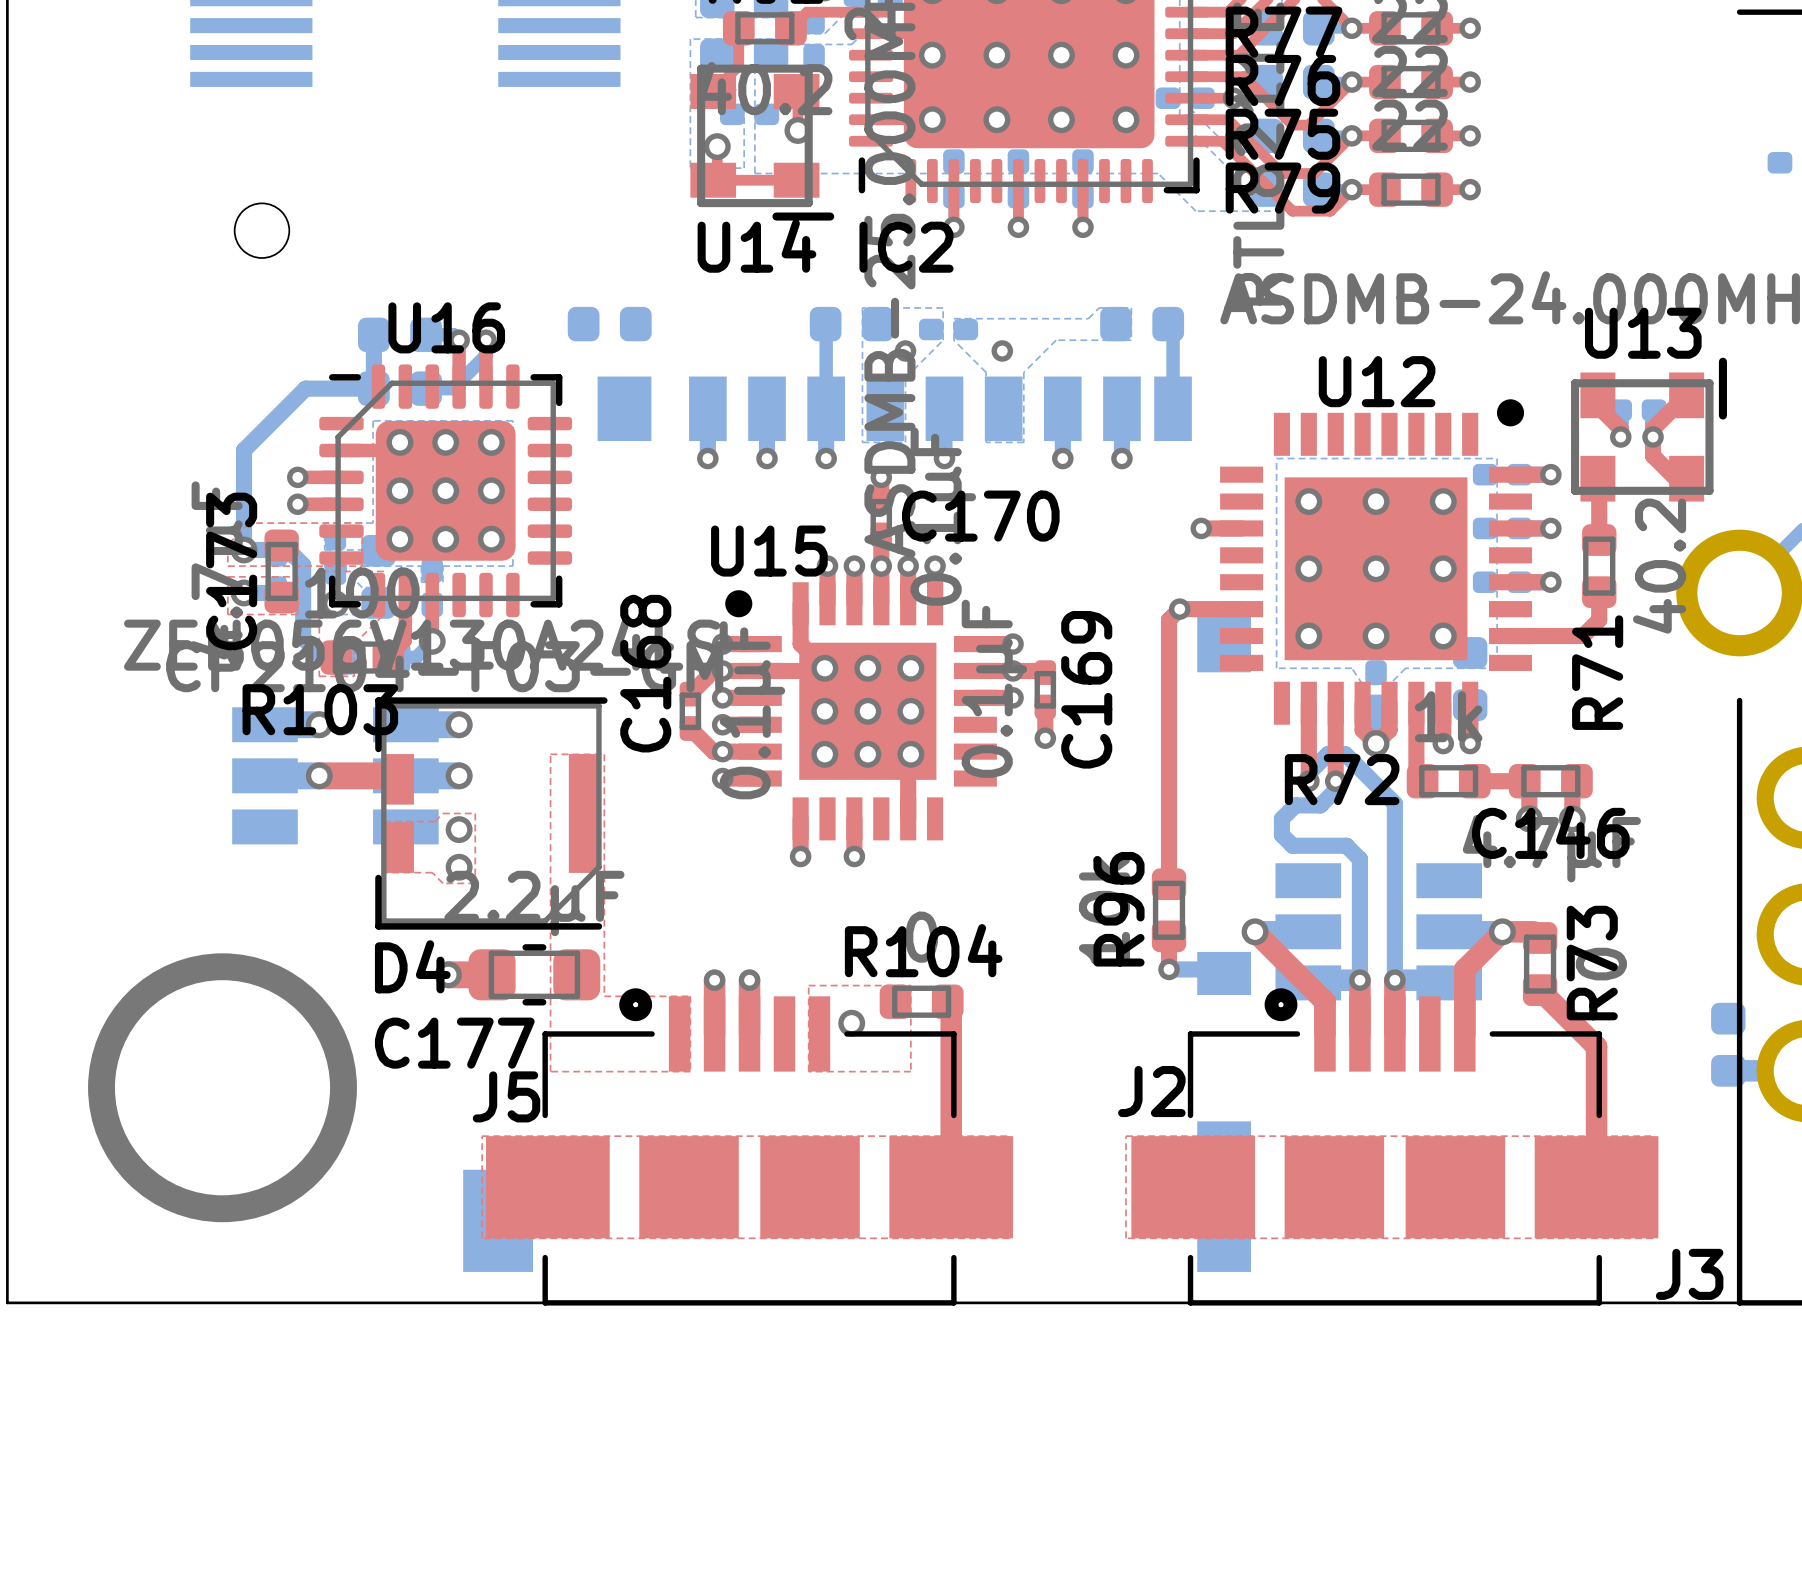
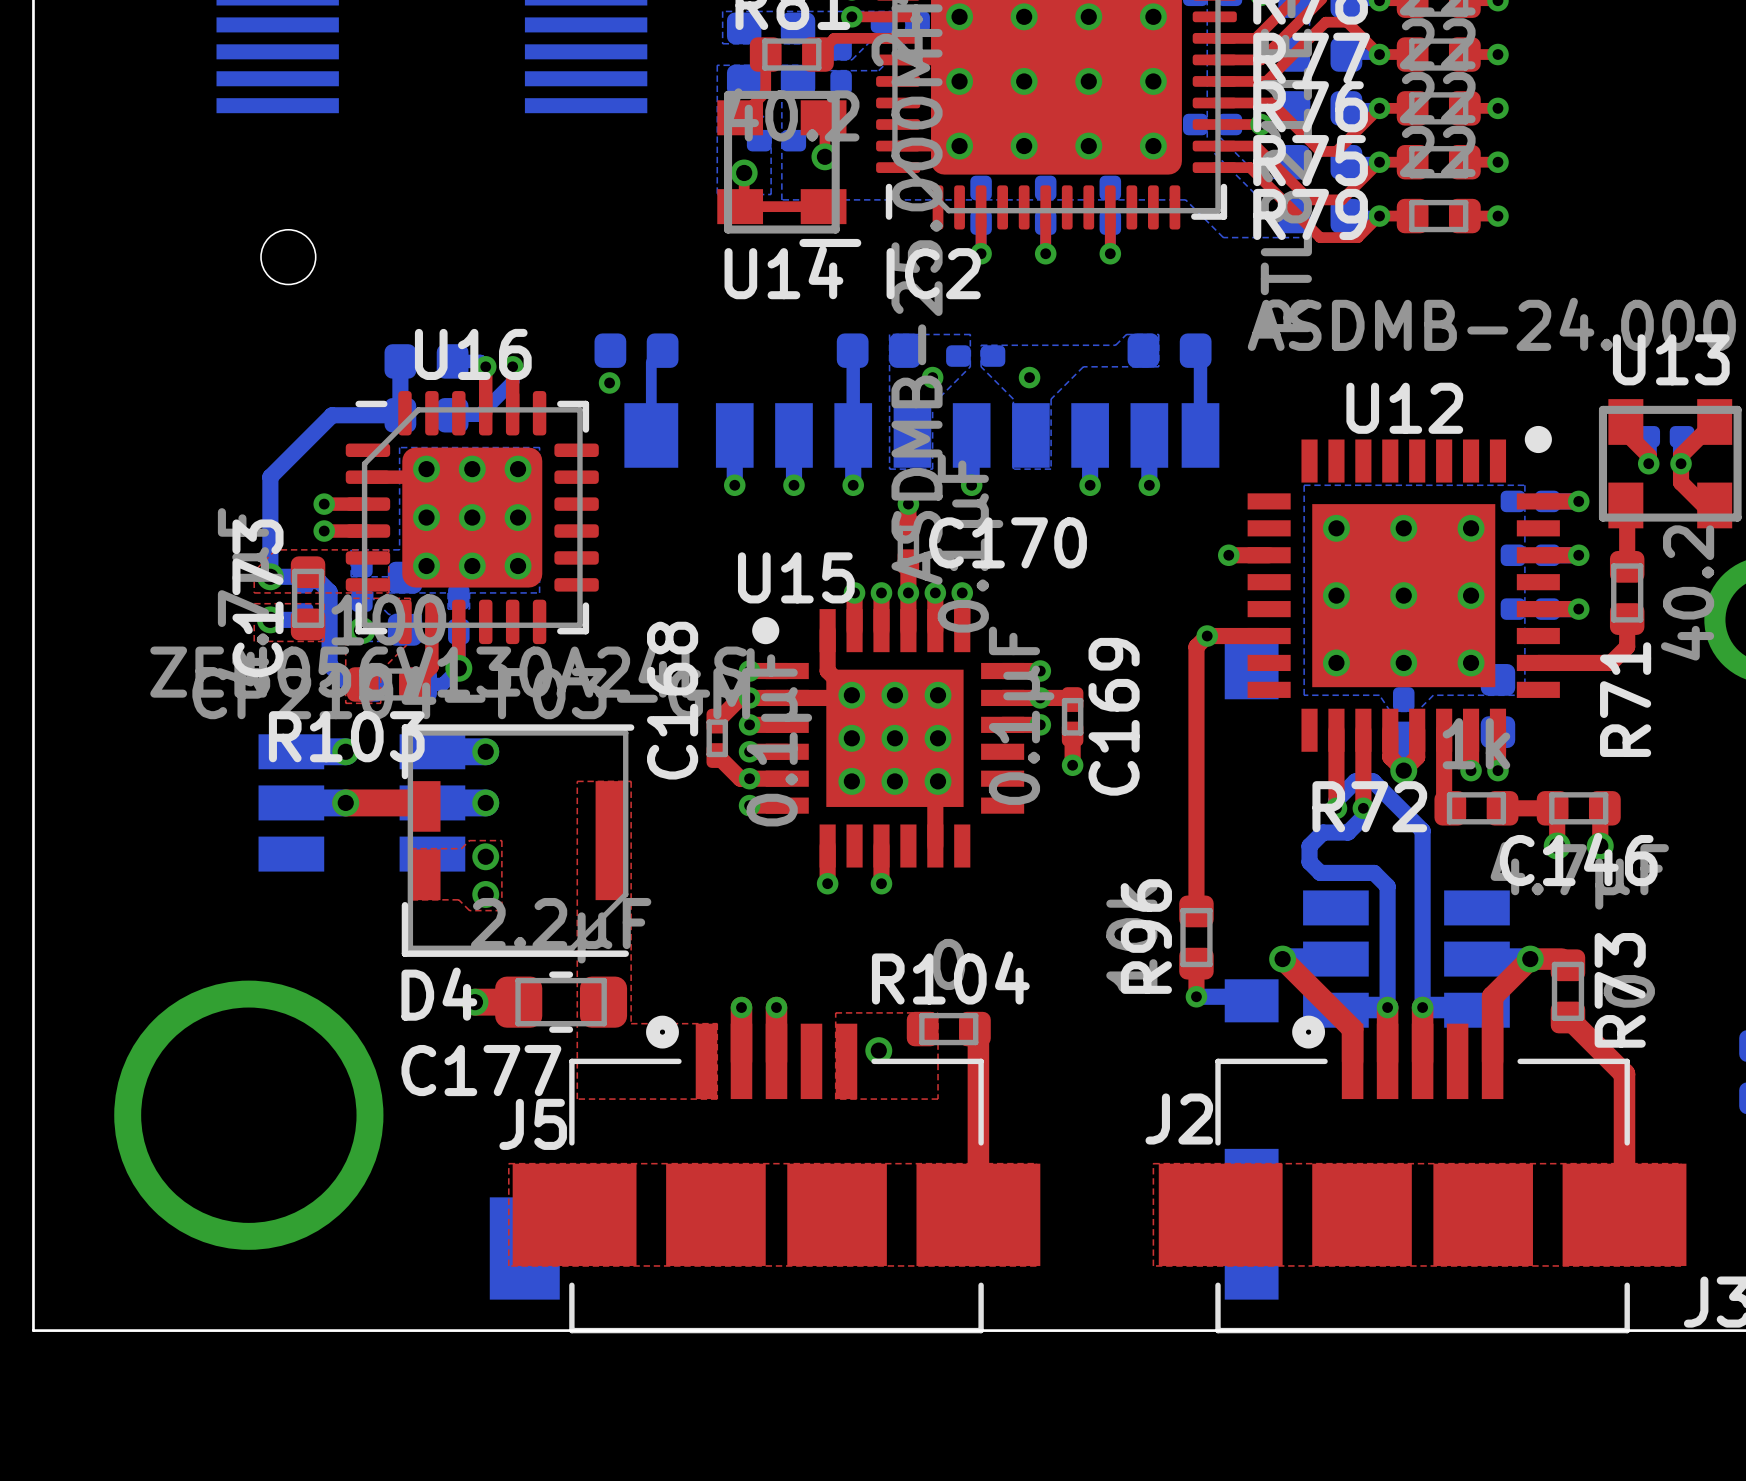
bottom track: none -> (651, 361) (651, 435)
via: none -> (609, 382)

